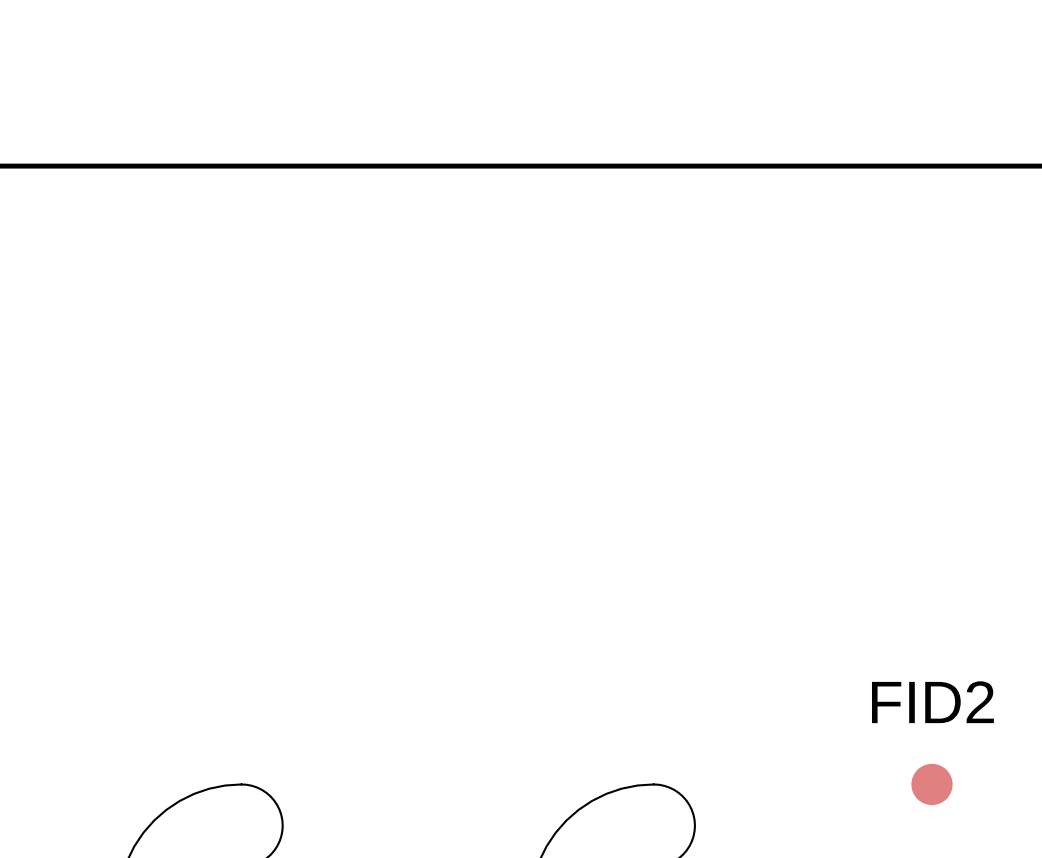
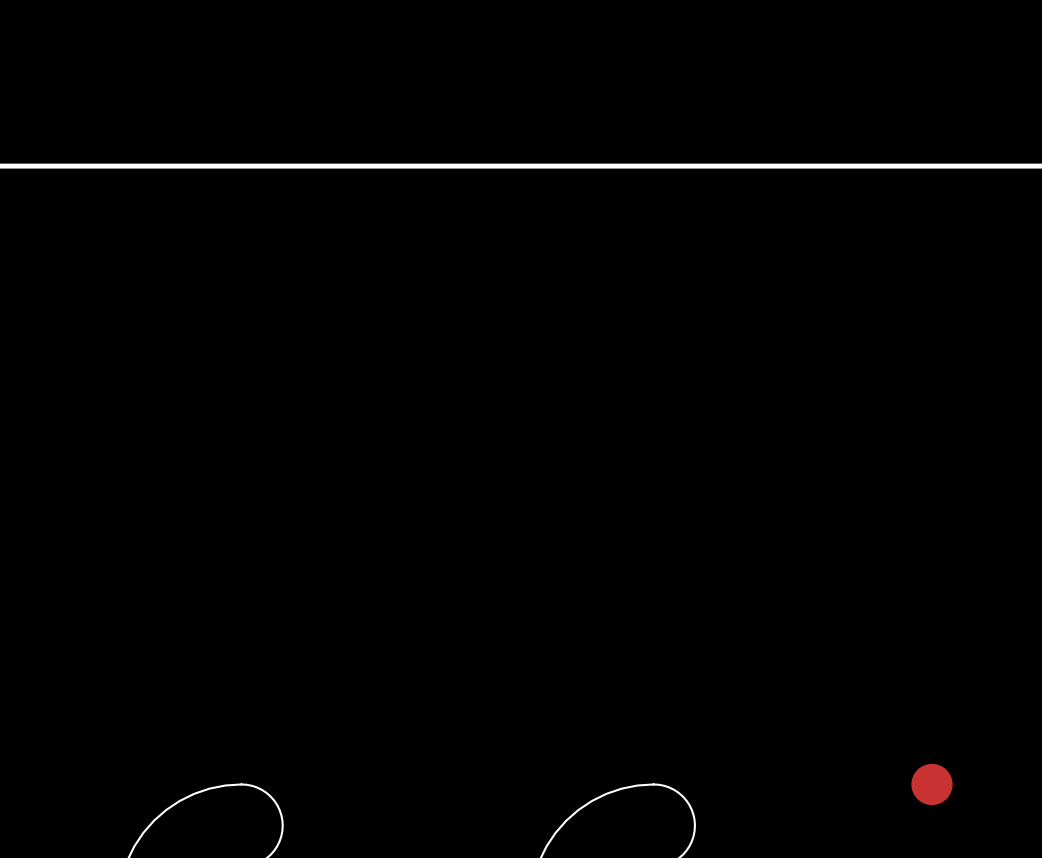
FID2 name: FID2 (932, 702) -> none

